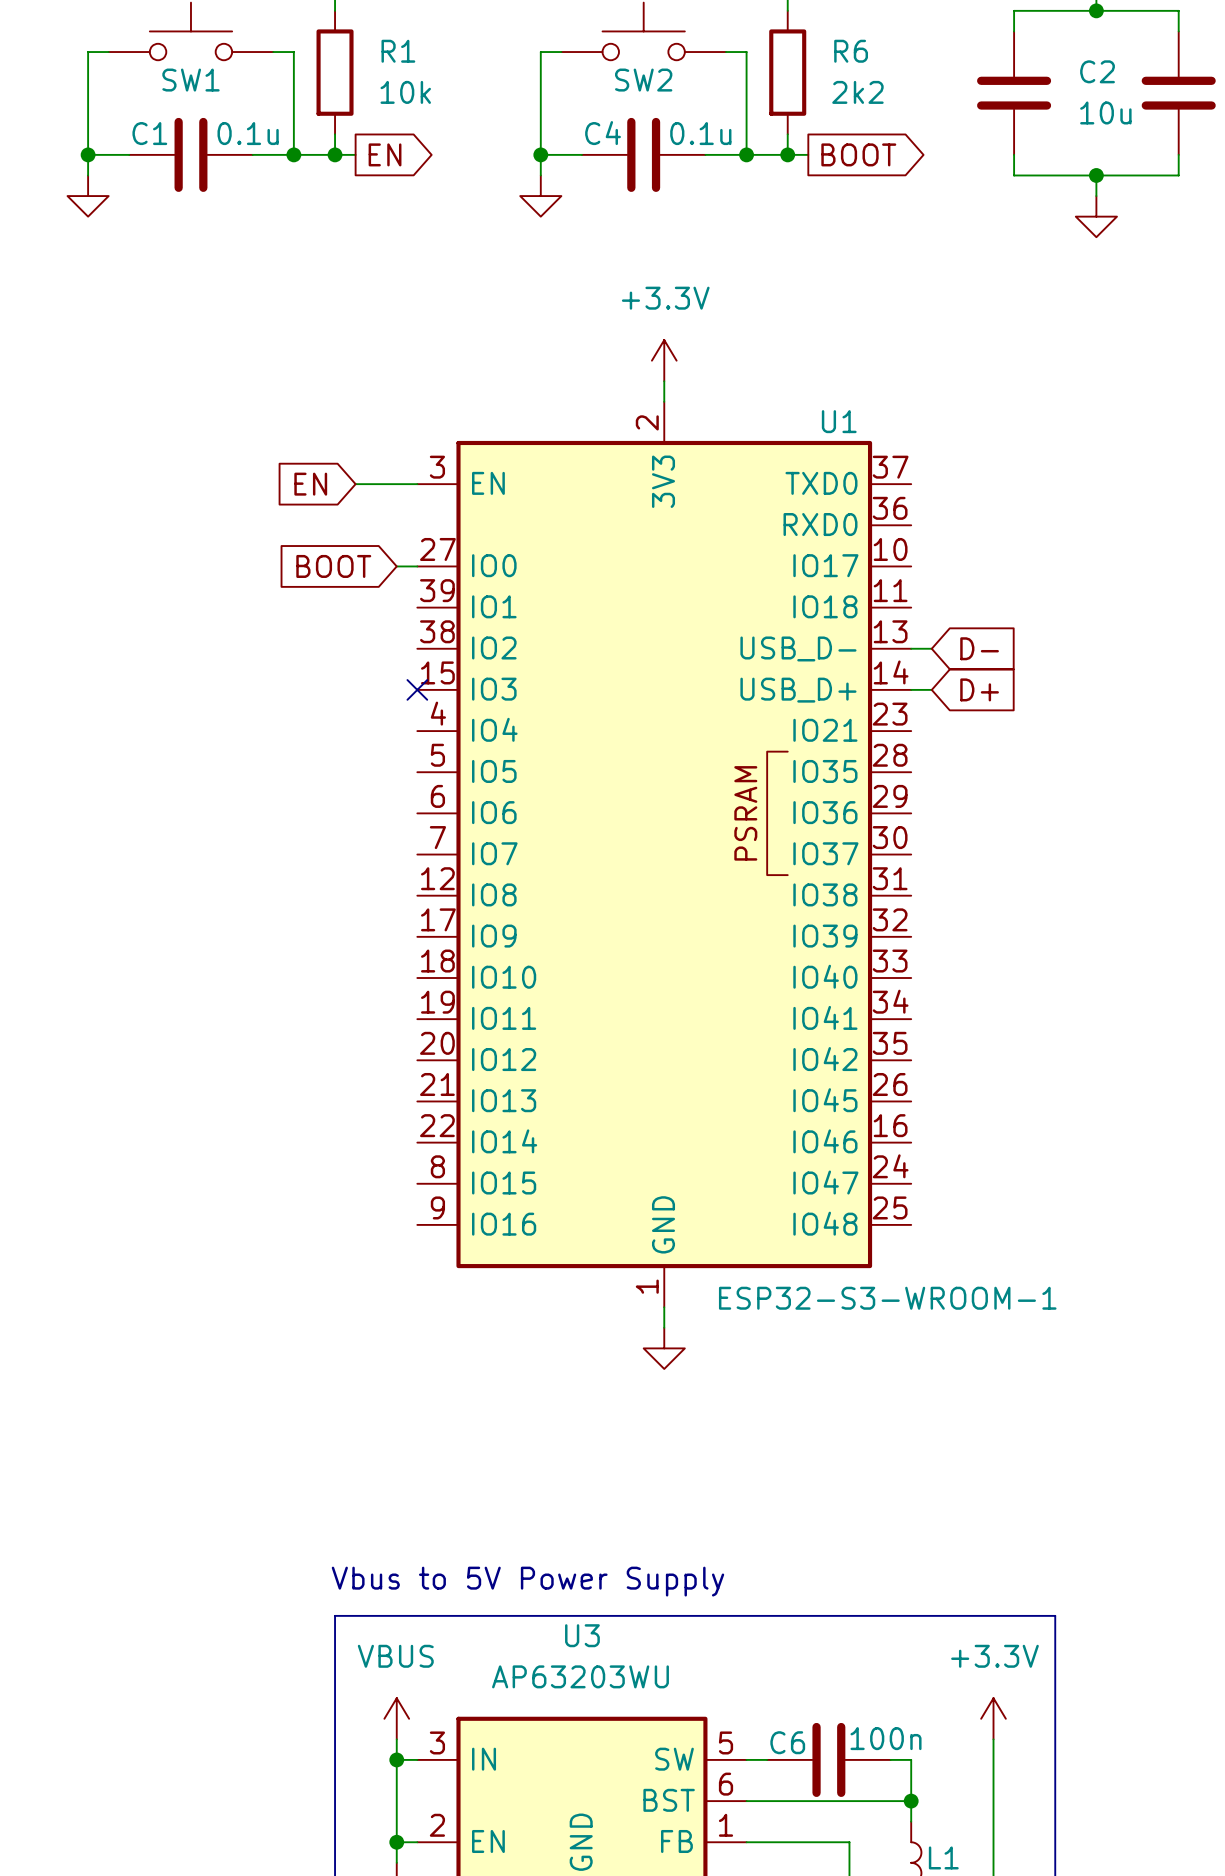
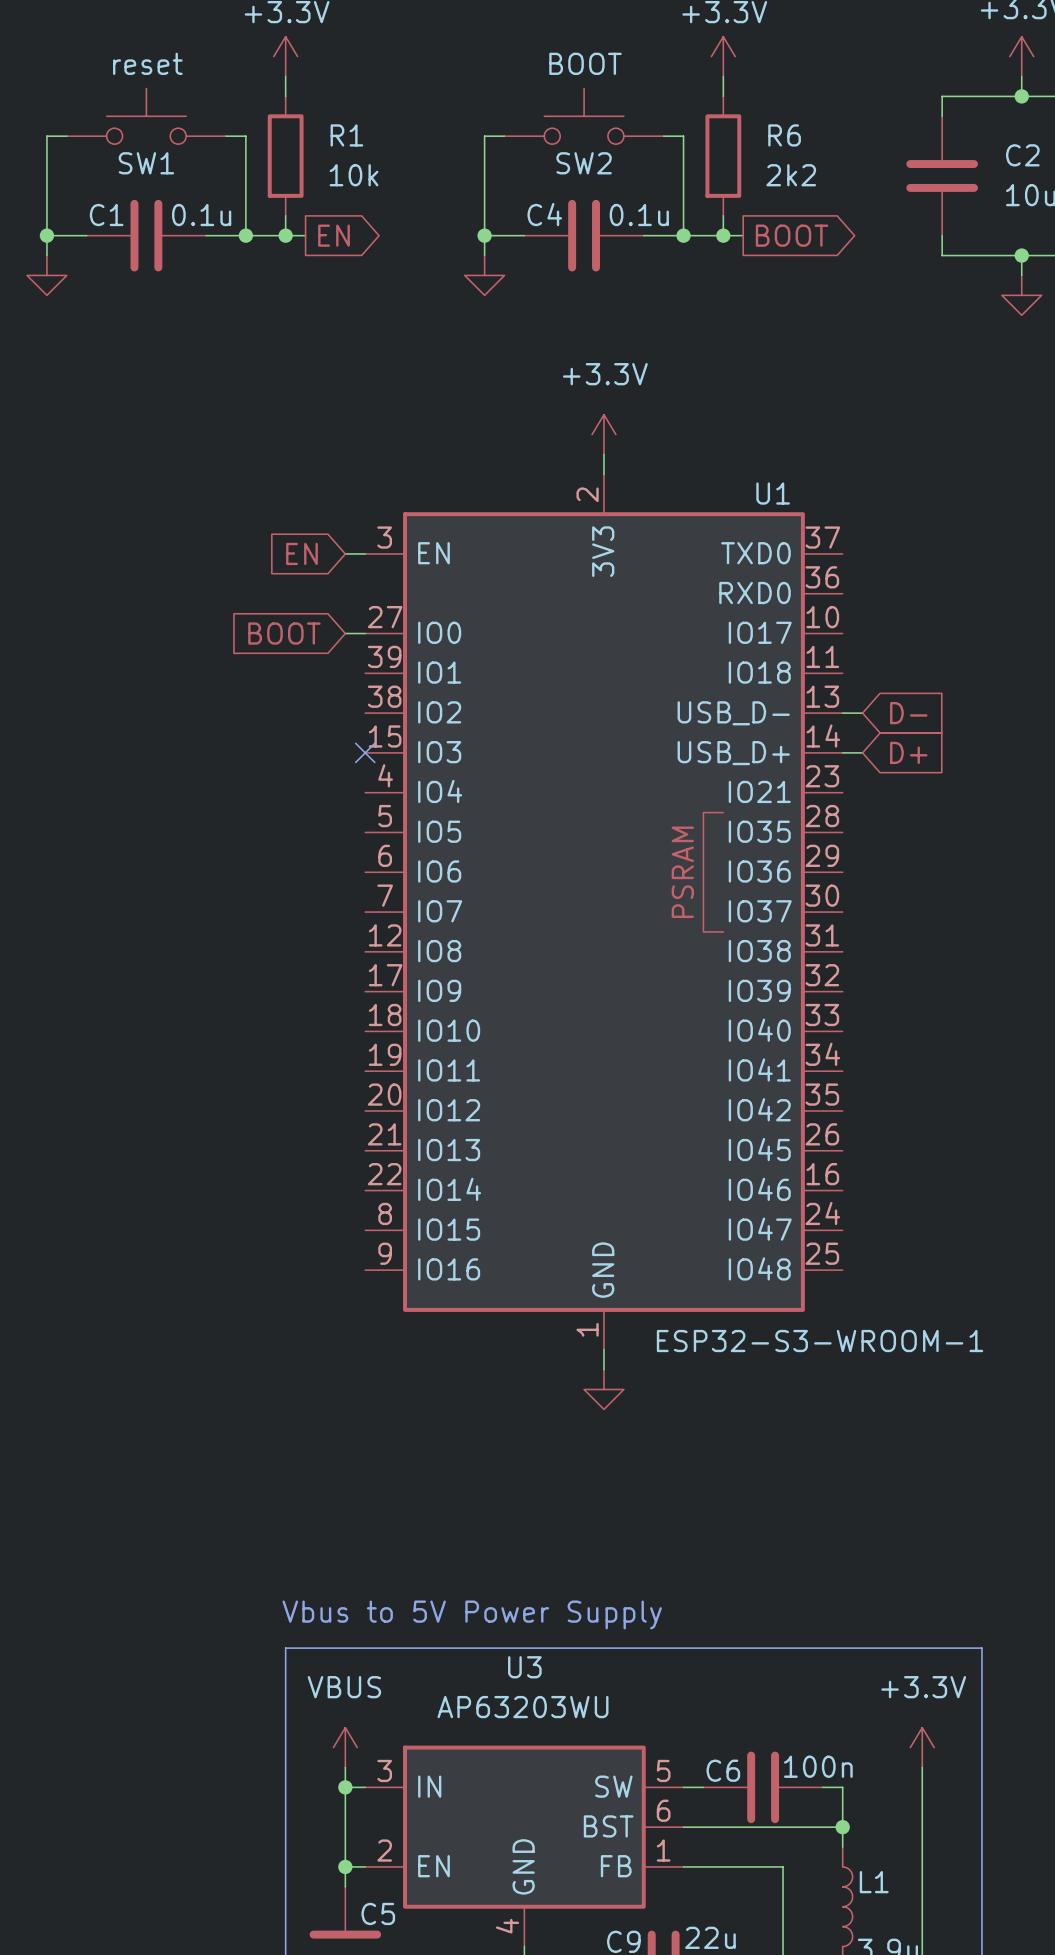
global label position: EN (310, 484) -> EN (301, 553)
wire: (355, 484) (396, 484) -> none

